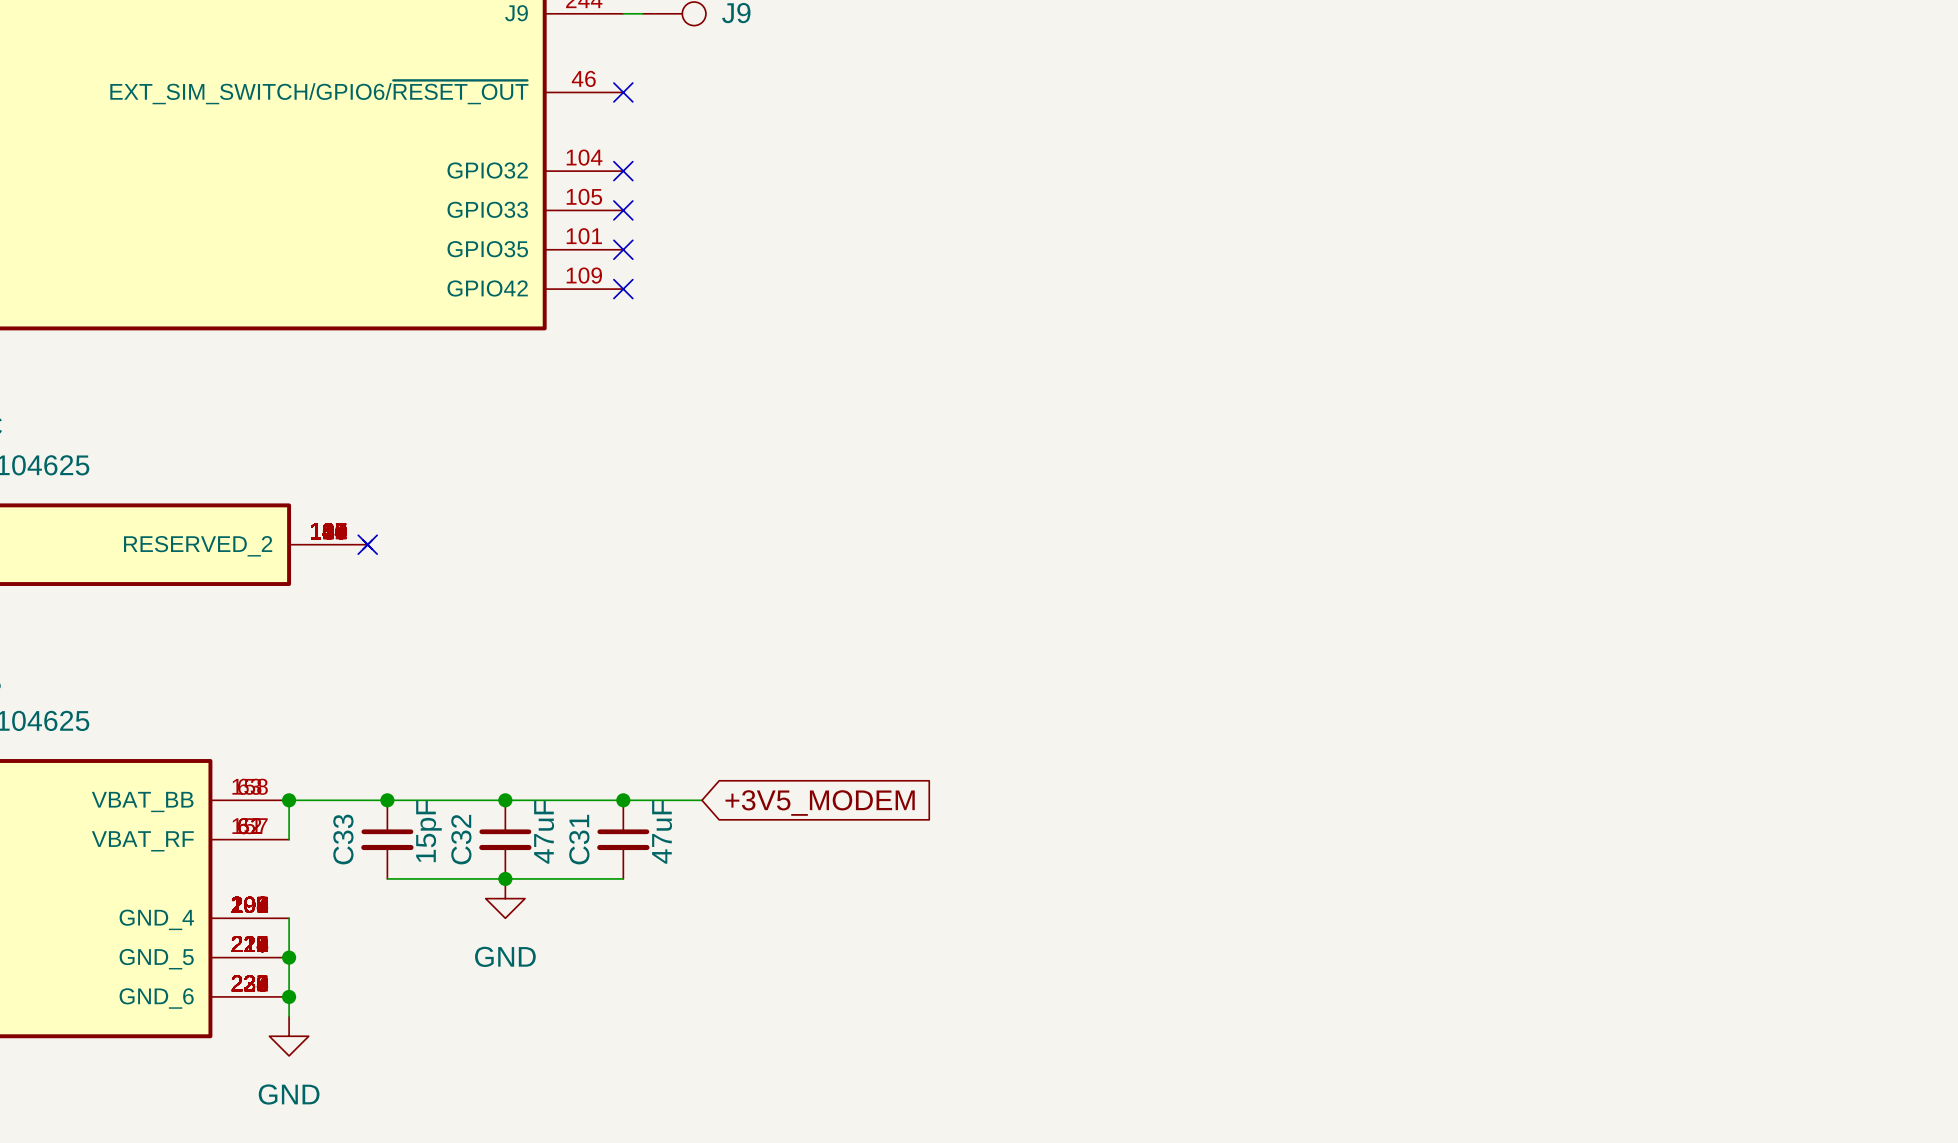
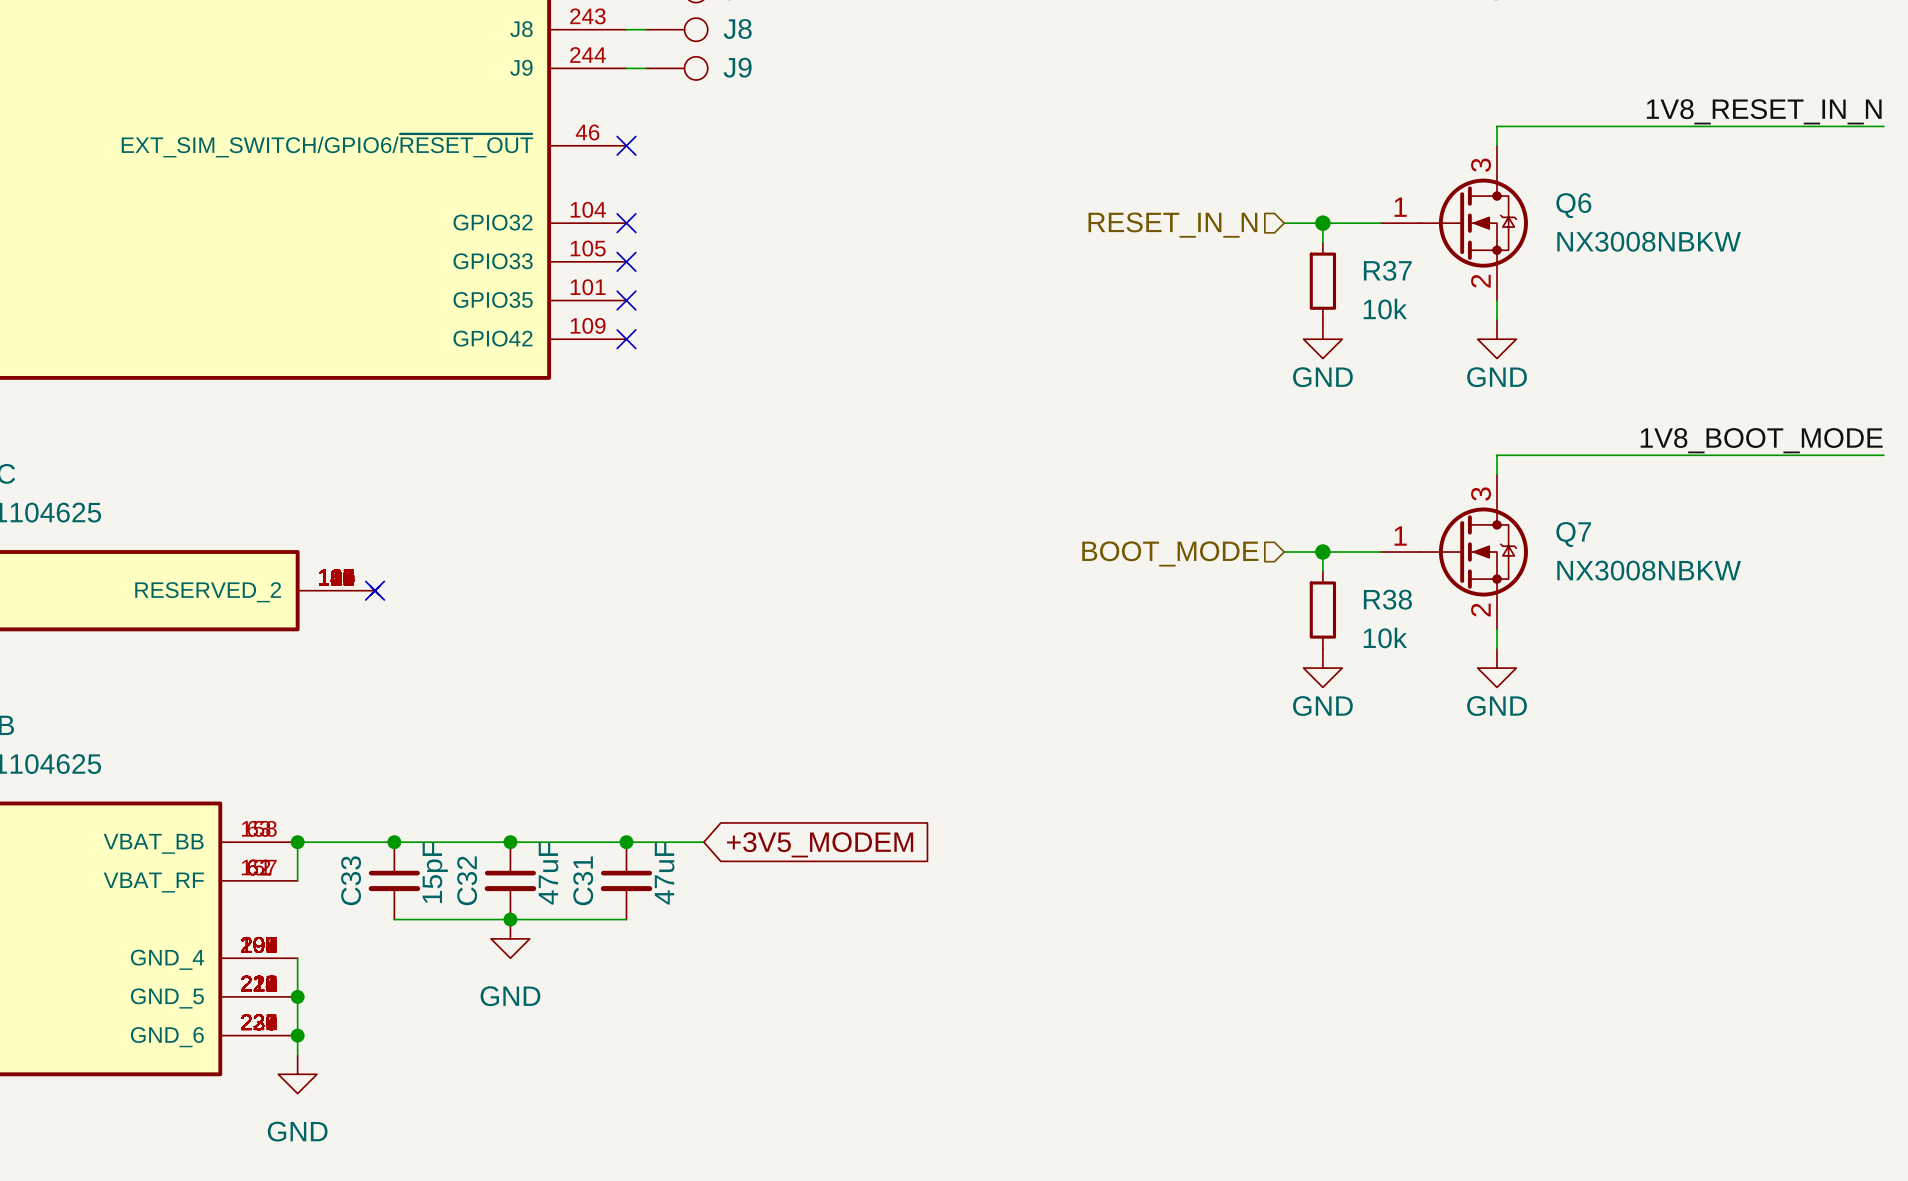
label: none -> 1V8_RESET_IN_N (1764, 111)
wire: none -> (1883, 126) (1496, 126) (1496, 145)
wire: none -> (1284, 223) (1380, 223)
wire: none -> (1322, 223) (1322, 242)
junction: none -> (1322, 223)
Q6: none -> NX3008NBKW (1454, 223)
hierarchical label: none -> RESET_IN_N (1172, 225)
R37: none -> 10k (1322, 281)
wire: none -> (1496, 300) (1496, 319)
power symbol: none -> GND (1322, 339)
power symbol: none -> GND (1496, 339)
label: none -> 1V8_BOOT_MODE (1761, 440)
wire: none -> (1883, 455) (1496, 455) (1496, 474)
wire: none -> (1284, 552) (1380, 552)
wire: none -> (1322, 552) (1322, 571)
junction: none -> (1322, 552)
Q7: none -> NX3008NBKW (1454, 552)
hierarchical label: none -> BOOT_MODE (1170, 553)
R38: none -> 10k (1322, 610)
wire: none -> (1496, 629) (1496, 648)
power symbol: none -> GND (1322, 668)
power symbol: none -> GND (1496, 668)

